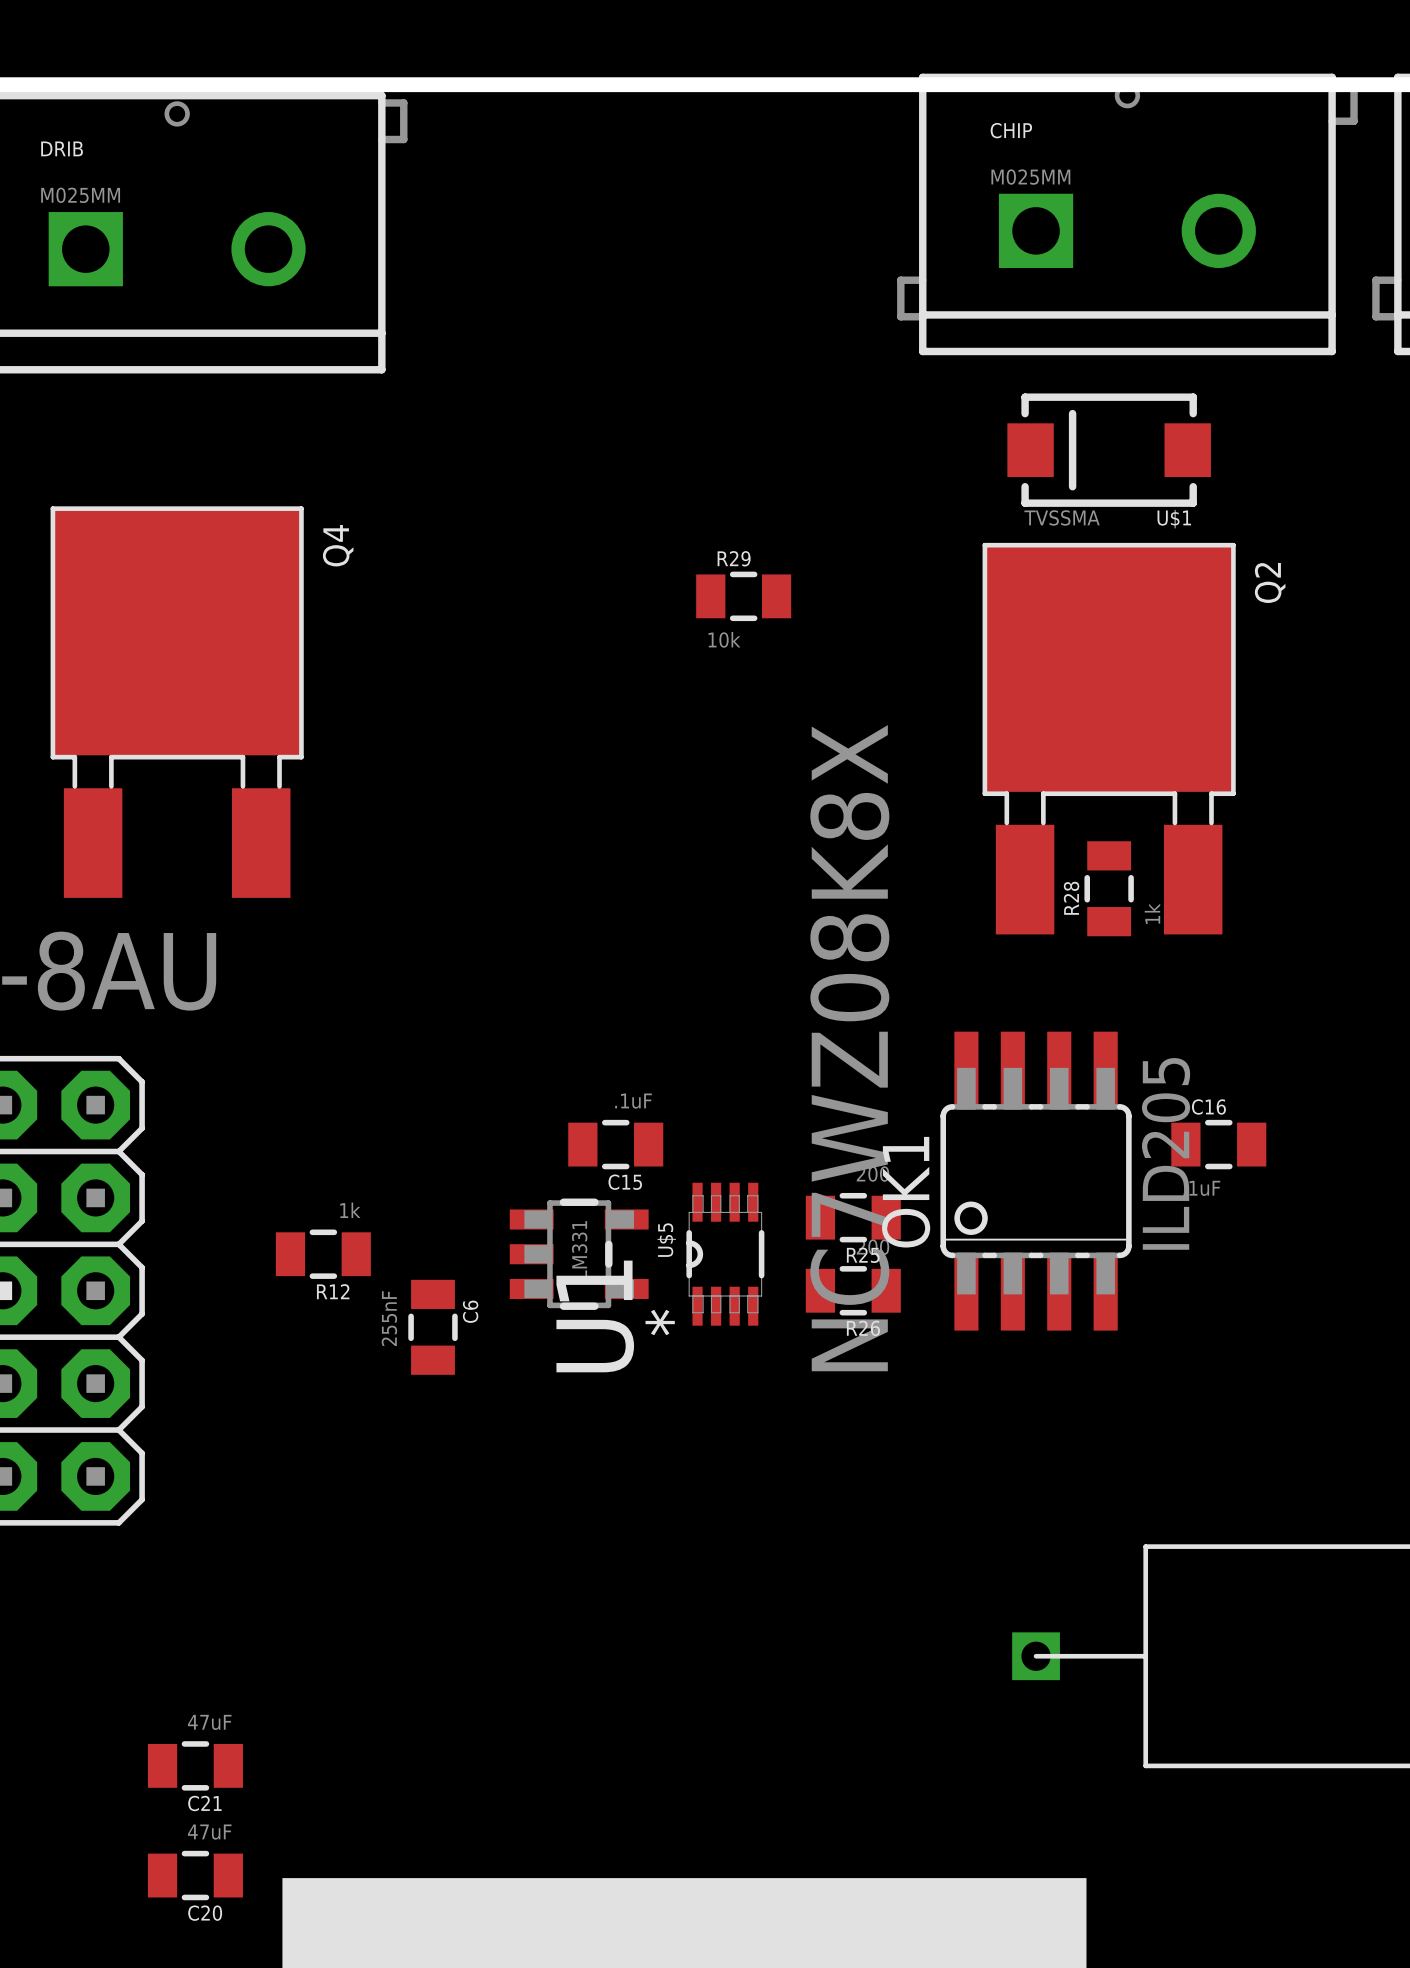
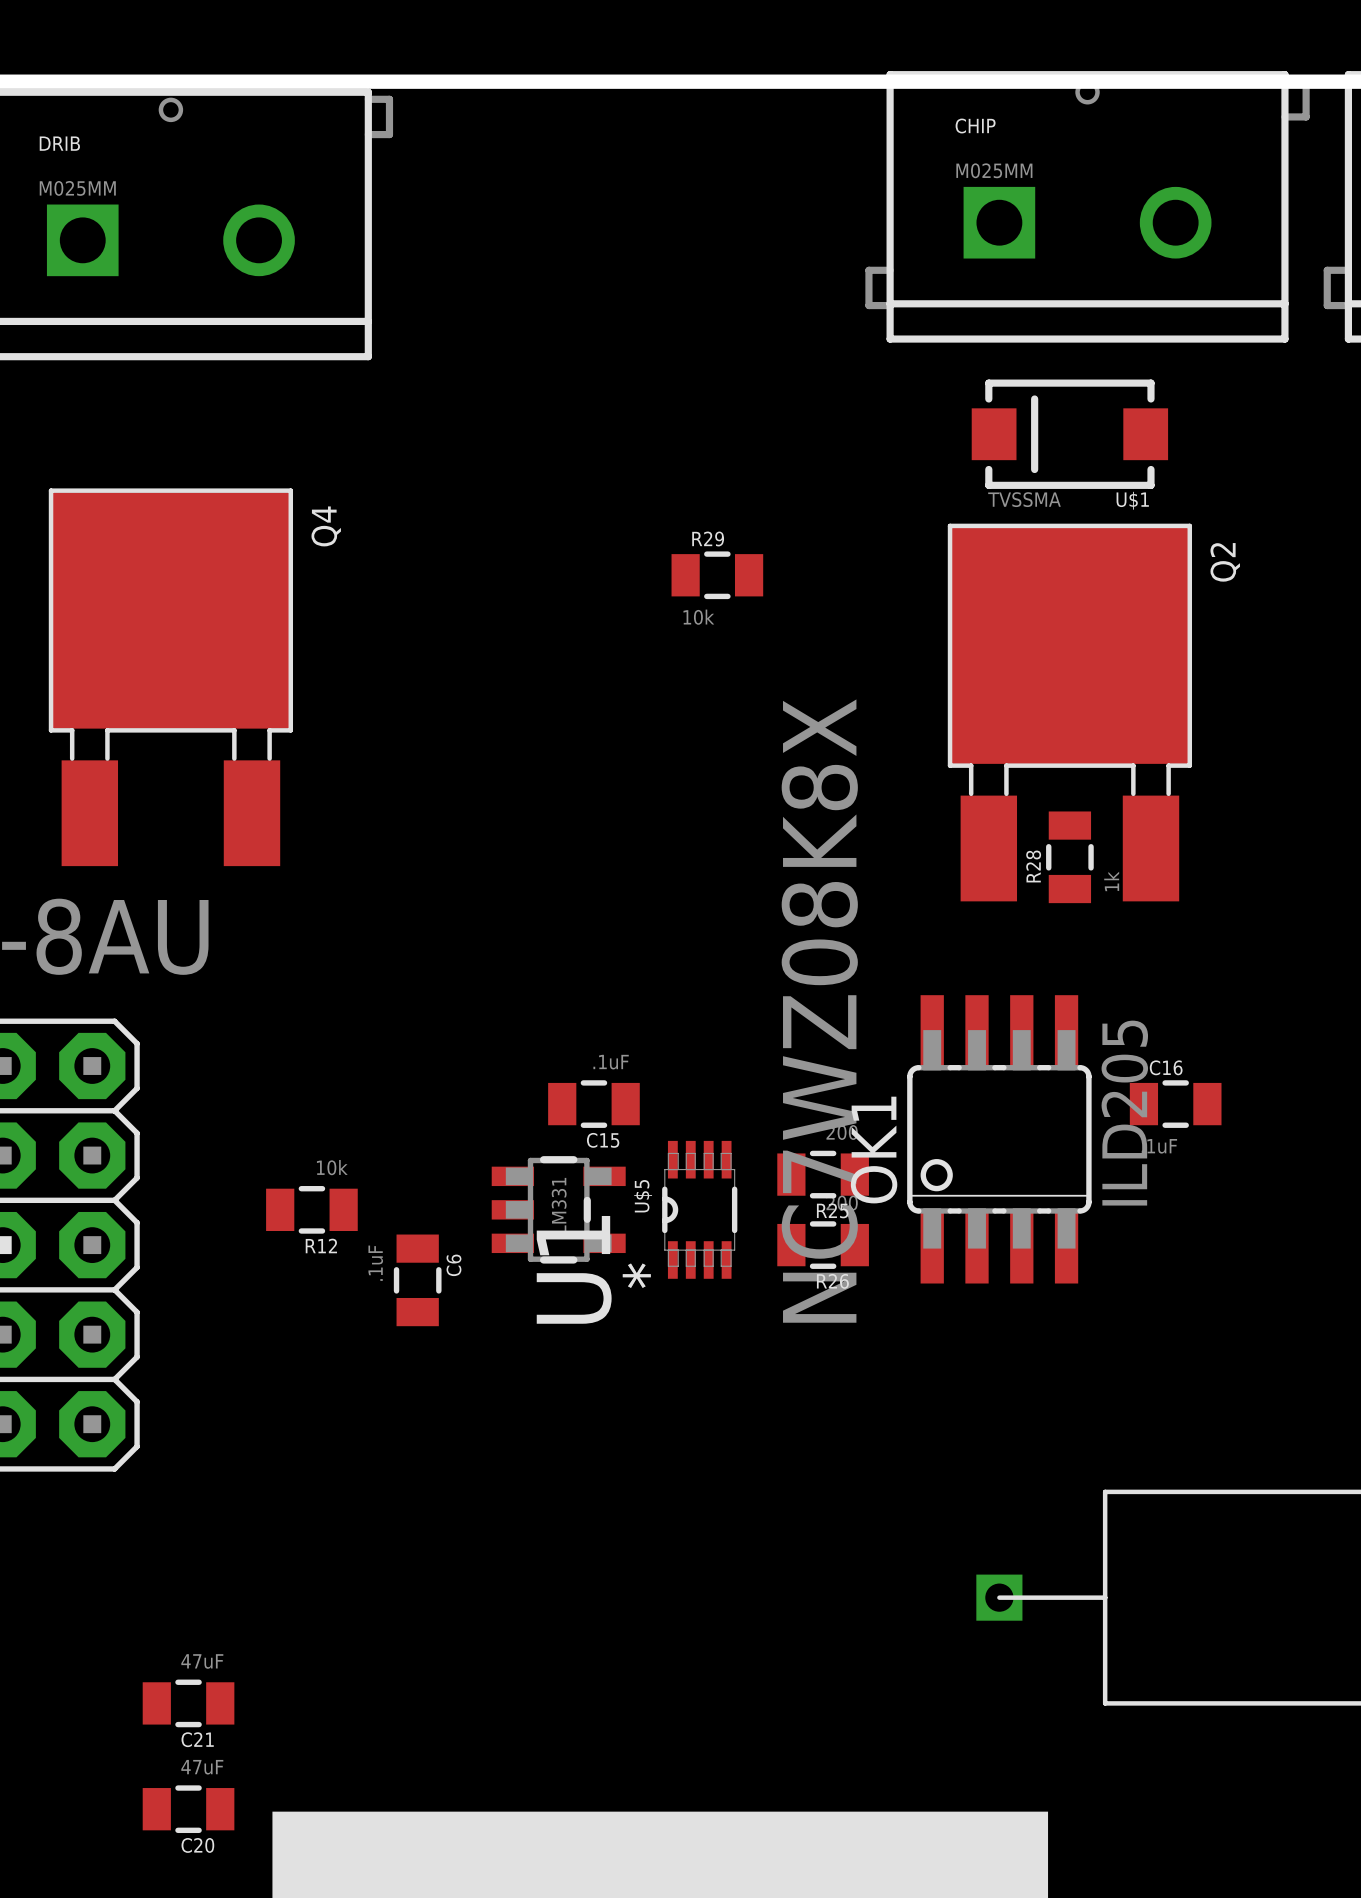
R12 value: 1k (350, 1210) -> 10k (332, 1167)
C6 value: 255nF (389, 1318) -> .1uF (375, 1263)

